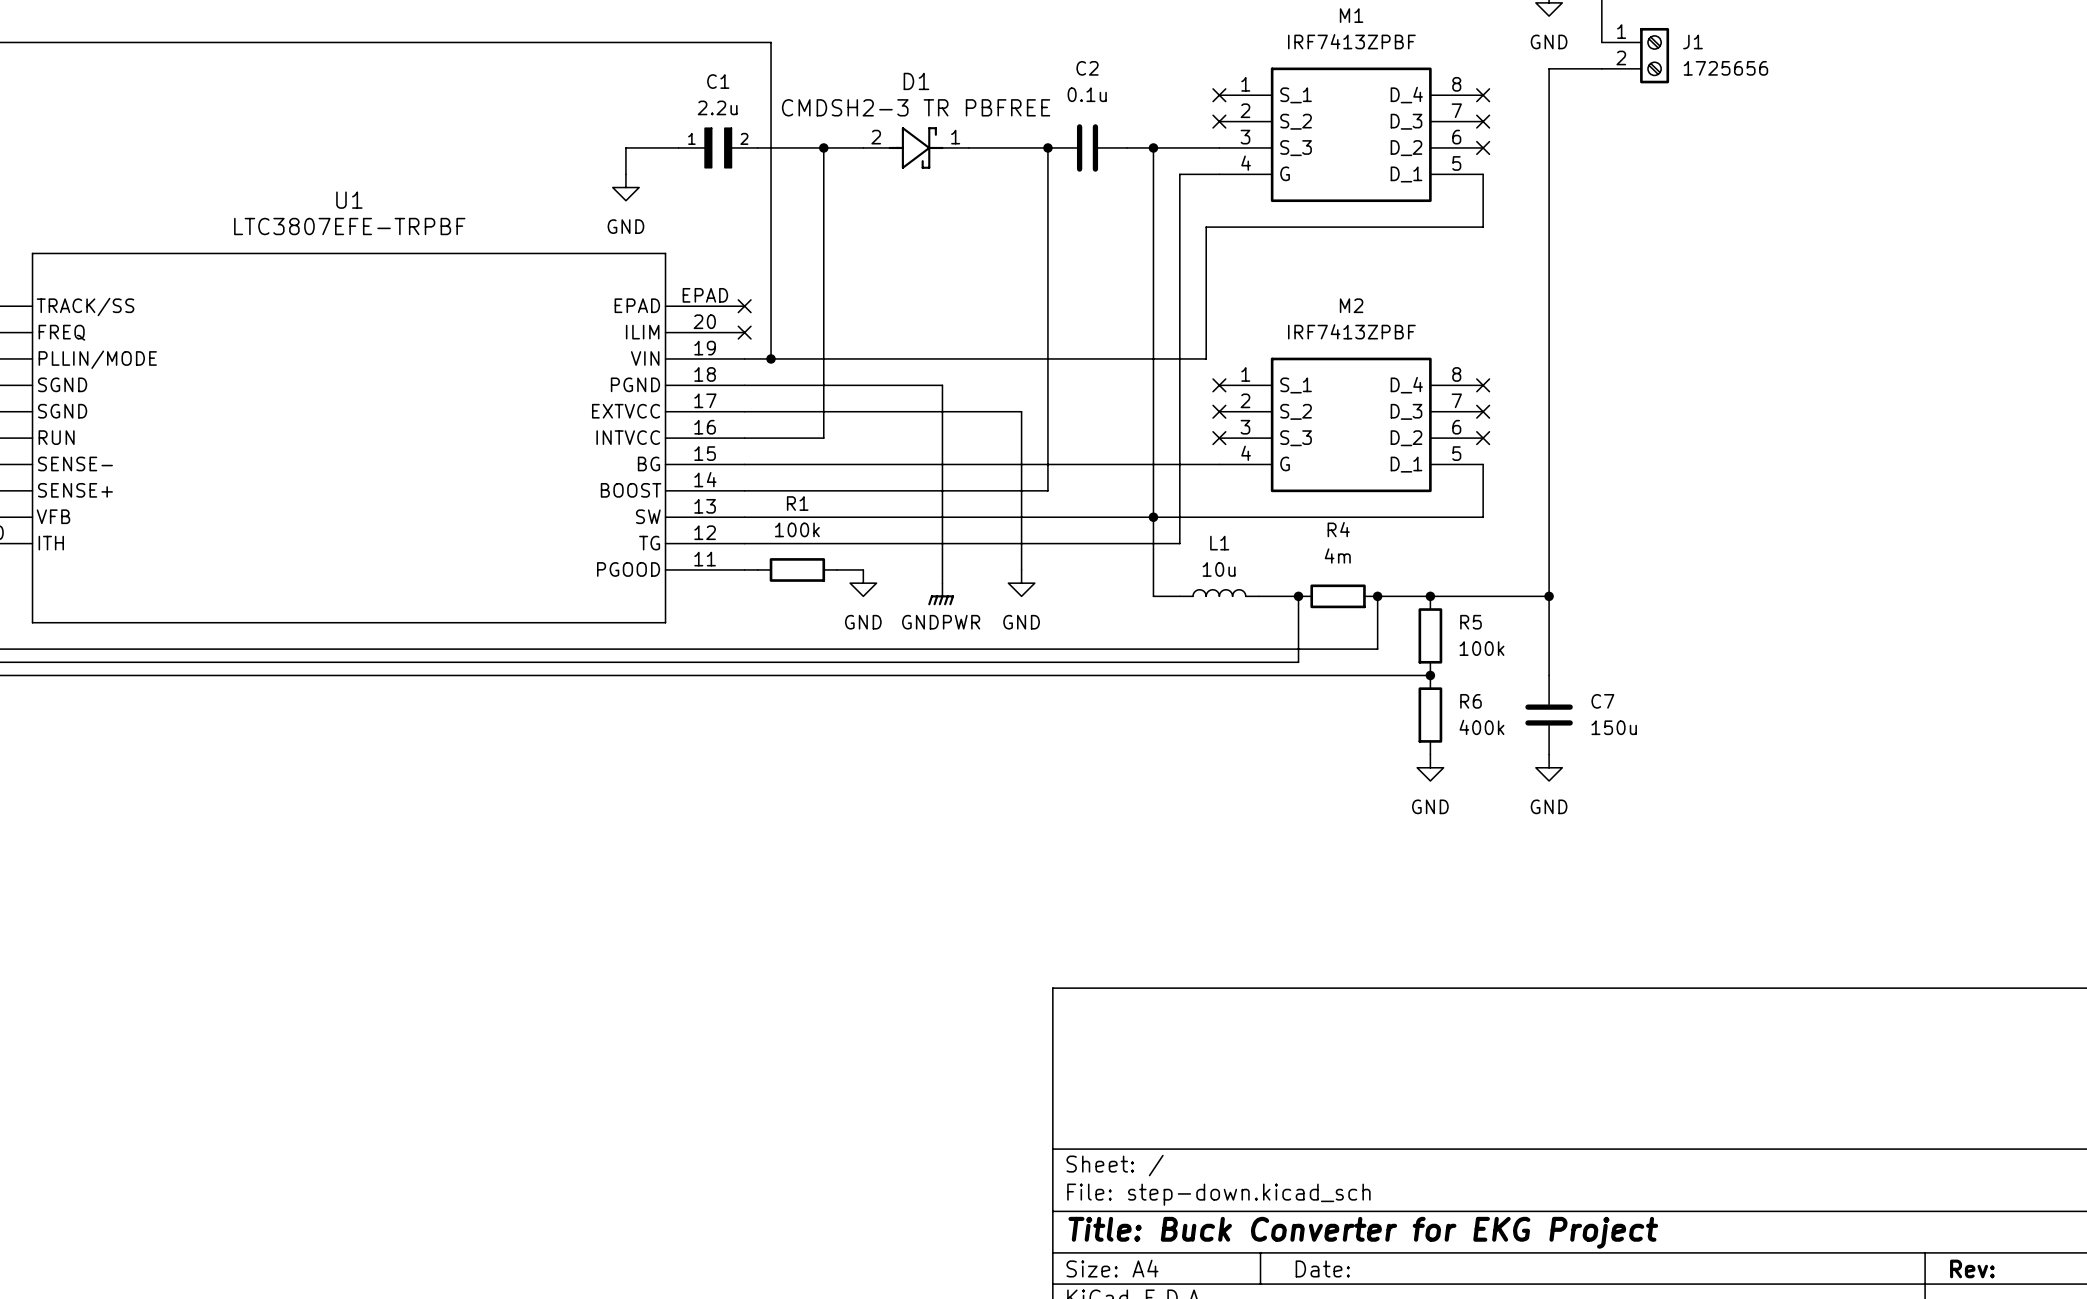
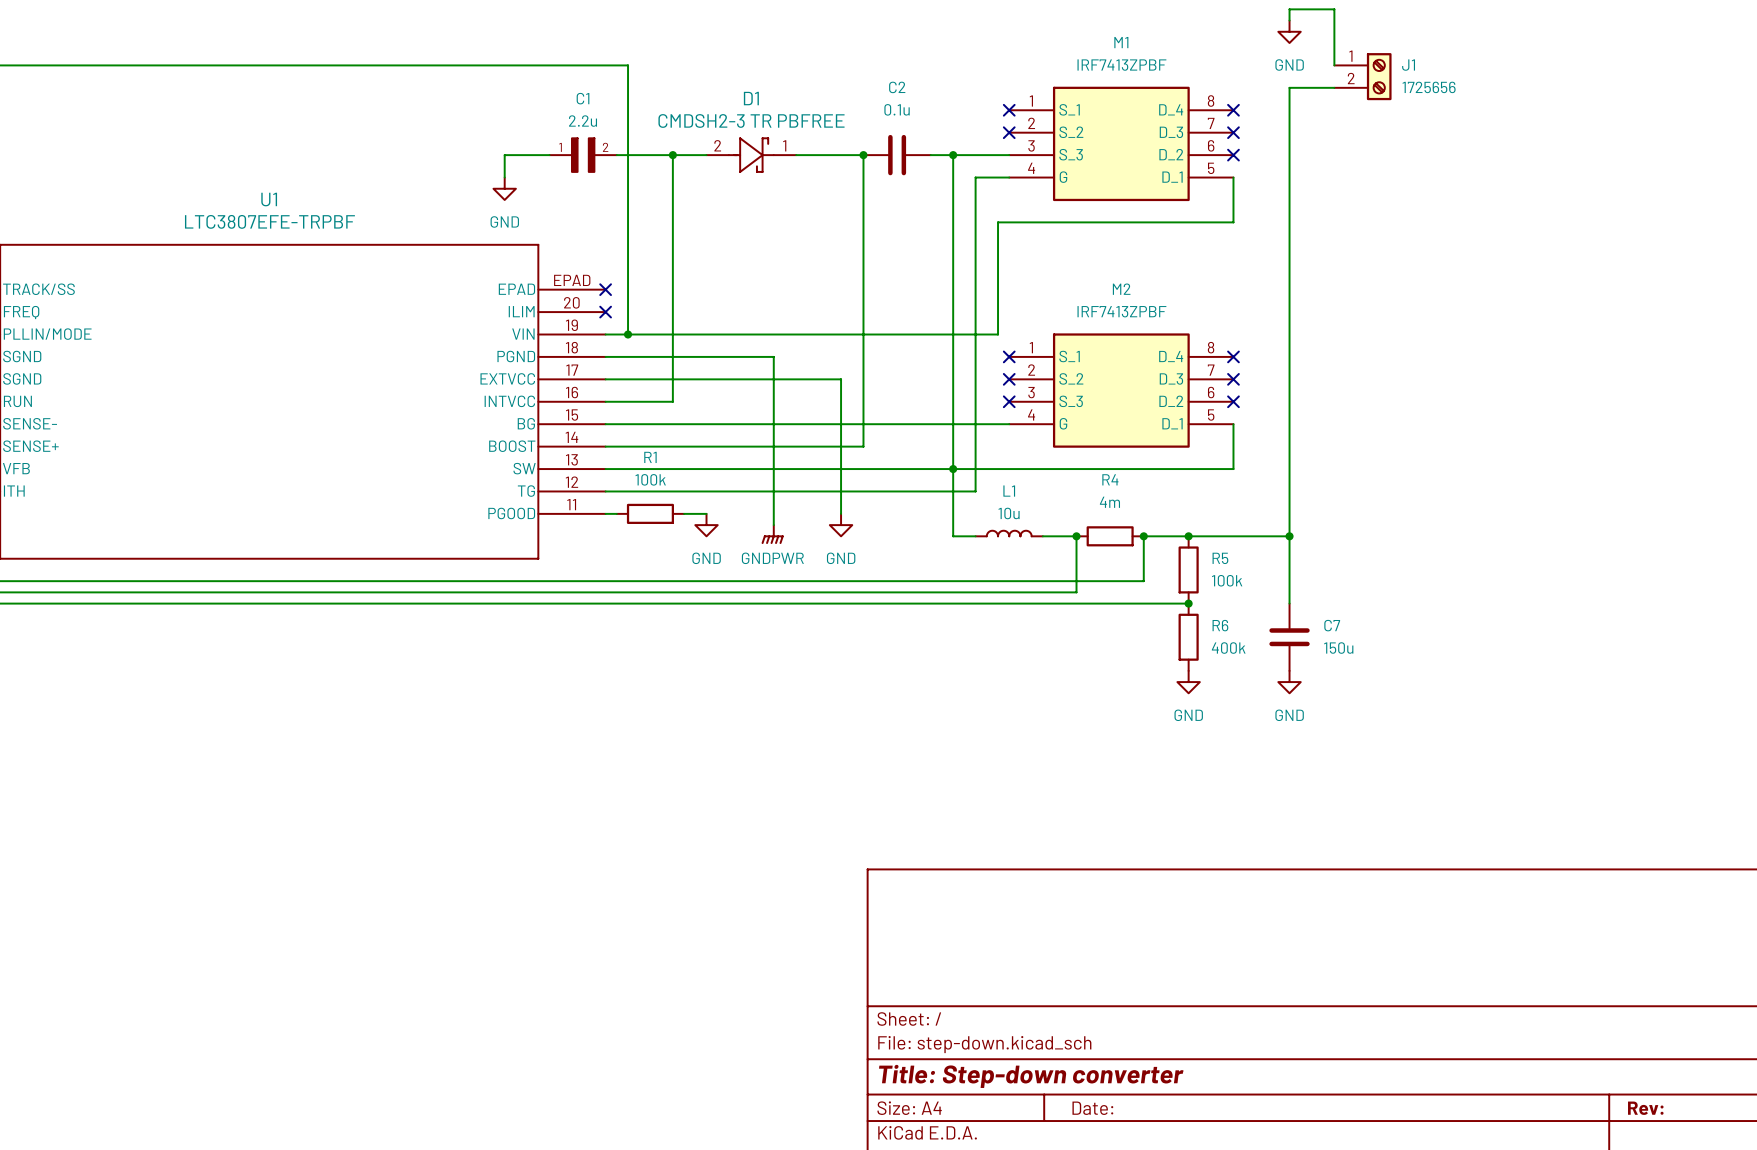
title block: Title: Buck Converter for EKG Project (1363, 1232) -> Title: Step-down converter (1031, 1076)

